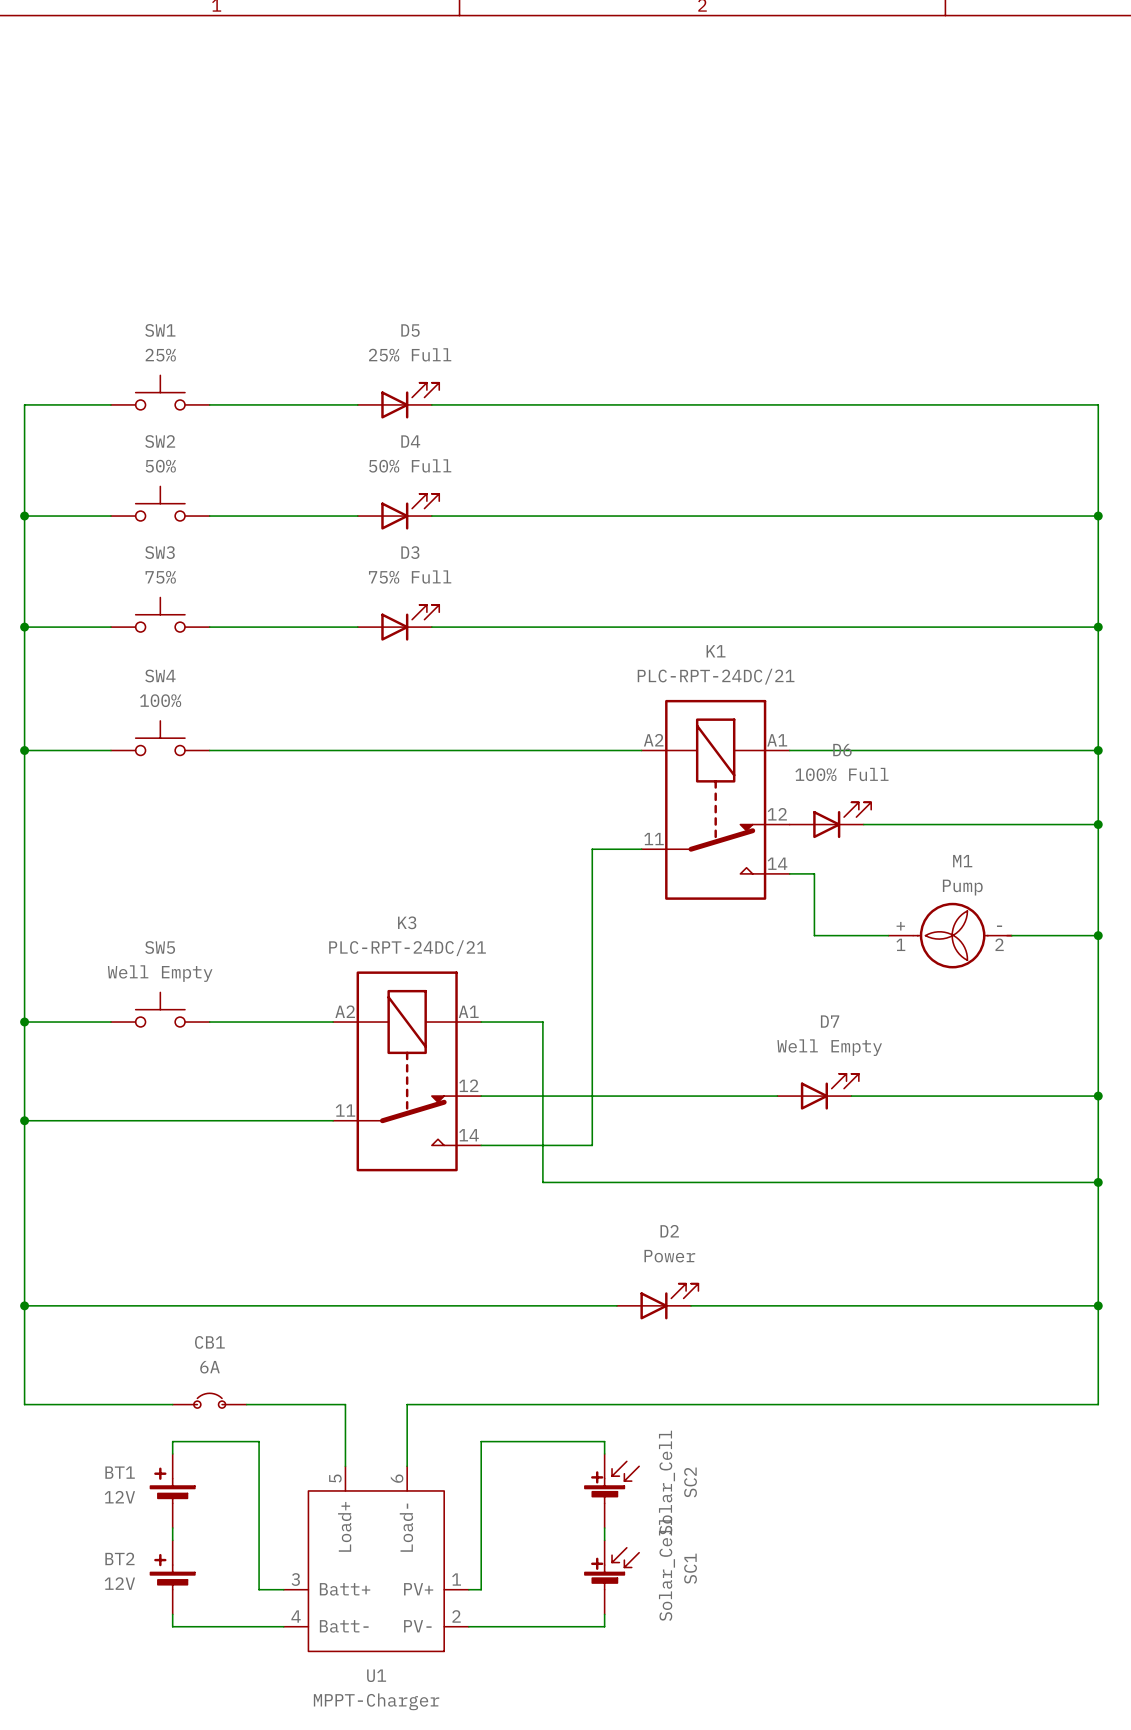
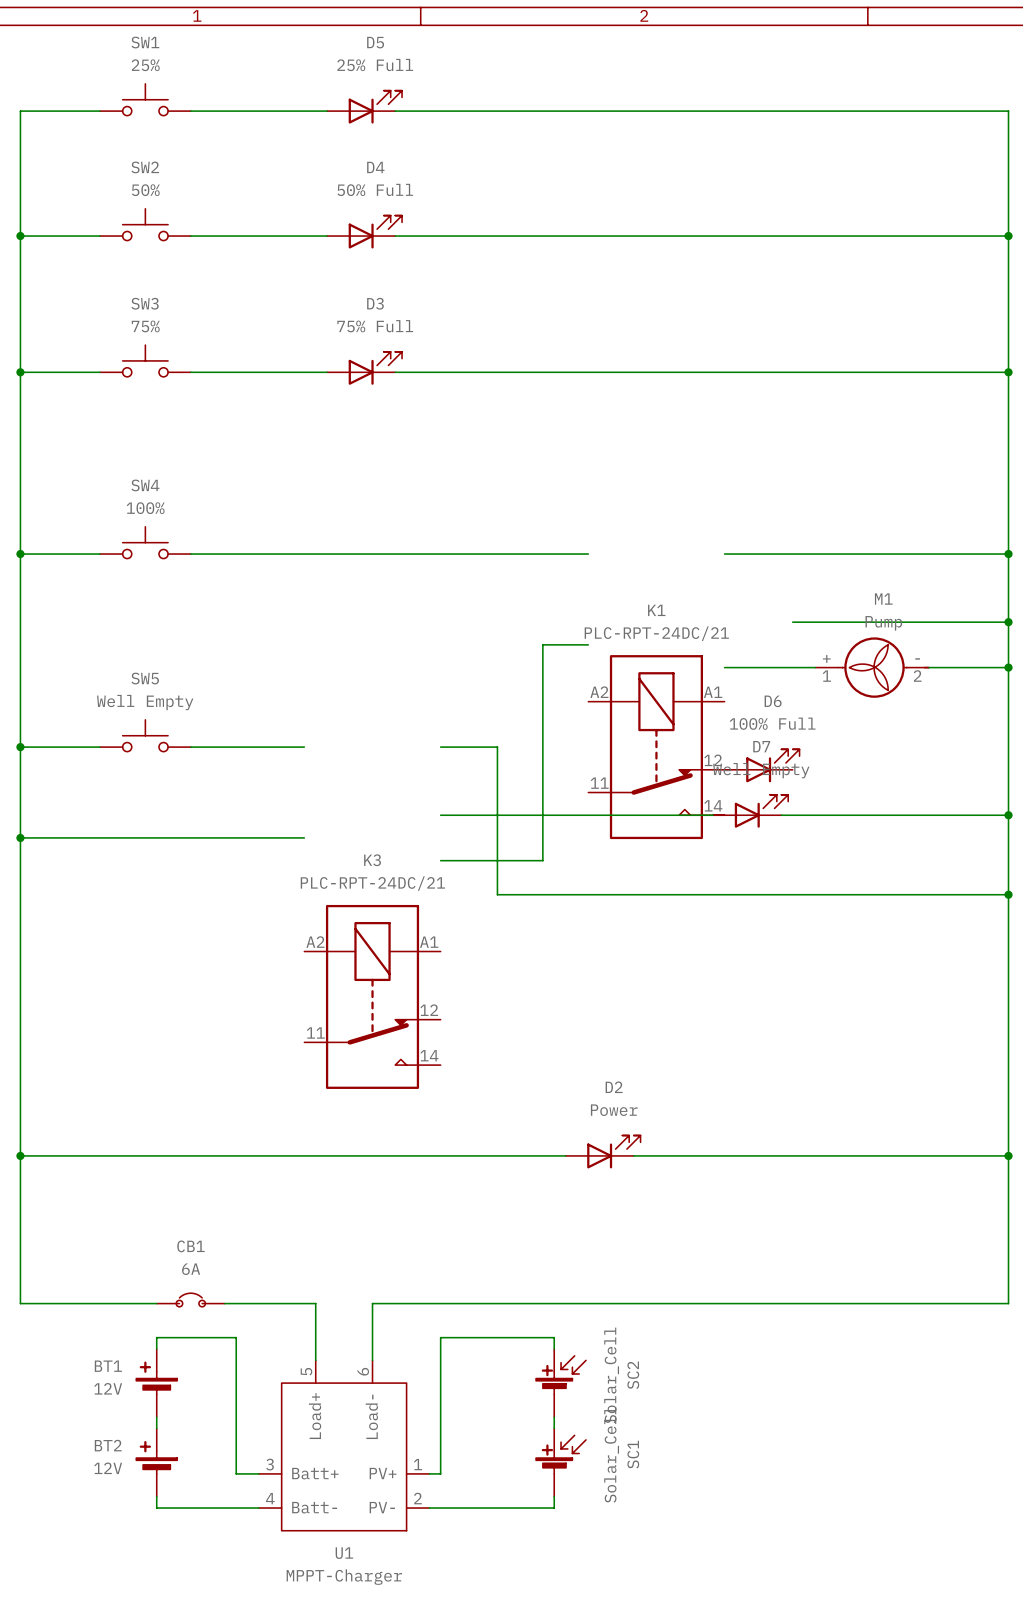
wire: none -> (190, 111) (327, 111)
wire: none -> (20, 236) (99, 236)
junction: none -> (20, 236)
wire: none -> (395, 236) (1008, 236)
junction: none -> (1008, 236)
junction: none -> (20, 372)
SW1 position: (160, 392) -> (145, 99)
junction: none -> (1008, 372)
D5 position: (398, 400) -> (364, 107)
wire: (24, 404) (110, 404) -> (20, 383) (20, 111) (99, 111)
wire: (209, 404) (357, 404) -> (190, 236) (327, 236)
wire: (431, 404) (1098, 404) -> (395, 111) (1008, 111) (1008, 383)
SW2 position: (160, 503) -> (145, 224)
D4 position: (398, 511) -> (364, 232)
wire: (24, 516) (110, 516) -> (20, 372) (99, 372)
junction: (24, 516) -> none
wire: (209, 516) (357, 516) -> (190, 372) (327, 372)
wire: (431, 516) (1098, 516) -> (395, 372) (1008, 372)
junction: (1098, 516) -> none
junction: none -> (20, 554)
junction: none -> (1008, 554)
SW3 position: (160, 614) -> (145, 360)
D3 position: (398, 622) -> (364, 368)
wire: (24, 627) (110, 627) -> none
junction: (24, 627) -> none
wire: (209, 627) (357, 627) -> none
wire: (431, 627) (1098, 627) -> none
junction: (1098, 627) -> none
junction: none -> (1008, 622)
wire: none -> (724, 667) (815, 667)
SW4 position: (160, 738) -> (145, 542)
wire: (24, 750) (110, 750) -> (20, 554) (99, 554)
junction position: (24, 750) -> (20, 747)
wire: (209, 750) (641, 750) -> (190, 554) (588, 554)
wire: (789, 750) (1098, 750) -> (724, 554) (1008, 554)
junction position: (1098, 750) -> (1008, 667)
wire: (863, 824) (1098, 824) -> (792, 622) (1008, 622)
junction: (1098, 824) -> none
wire: (592, 849) (641, 849) -> (542, 792) (542, 644) (588, 644)
wire: (789, 873) (814, 873) (814, 935) (888, 935) -> none
junction: none -> (1008, 815)
junction: none -> (20, 837)
wire: (592, 923) (592, 1145) (481, 1145) -> (542, 860) (440, 860)
M1 position: (950, 935) -> (872, 667)
wire: (1011, 935) (1098, 935) -> (929, 667) (1008, 667)
junction position: (1098, 935) -> (1008, 894)
SW5 position: (160, 1009) -> (145, 735)
wire: (24, 1022) (110, 1022) -> (20, 747) (99, 747)
junction: (24, 1022) -> none
wire: (209, 1022) (333, 1022) -> (190, 747) (304, 747)
wire: (481, 1022) (542, 1022) (542, 1182) (1098, 1182) -> (440, 747) (497, 747) (497, 894) (1008, 894)
D7 position: (818, 1091) -> (750, 811)
wire: (481, 1096) (777, 1096) -> (440, 815) (713, 815)
wire: (851, 1096) (1098, 1096) -> (781, 815) (1008, 815)
junction: (1098, 1096) -> none
wire: (24, 1120) (333, 1120) -> (20, 837) (304, 837)
junction: (24, 1120) -> none
junction: (1098, 1182) -> none
junction: none -> (20, 1155)
junction: none -> (1008, 1155)
D2 position: (657, 1301) -> (603, 1151)
wire: (24, 1305) (616, 1305) -> (20, 1155) (565, 1155)
junction: (24, 1305) -> none
wire: (691, 1305) (1098, 1305) -> (633, 1155) (1008, 1155)
junction: (1098, 1305) -> none

